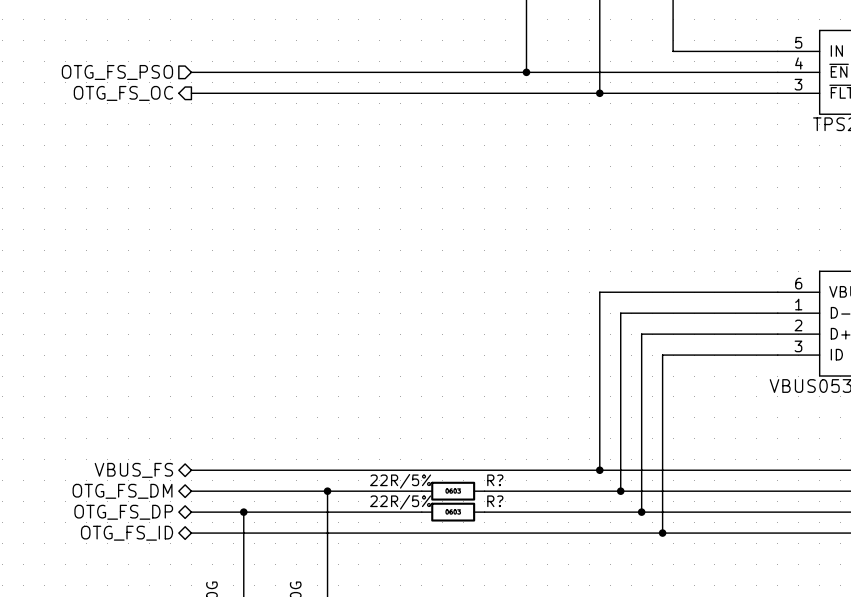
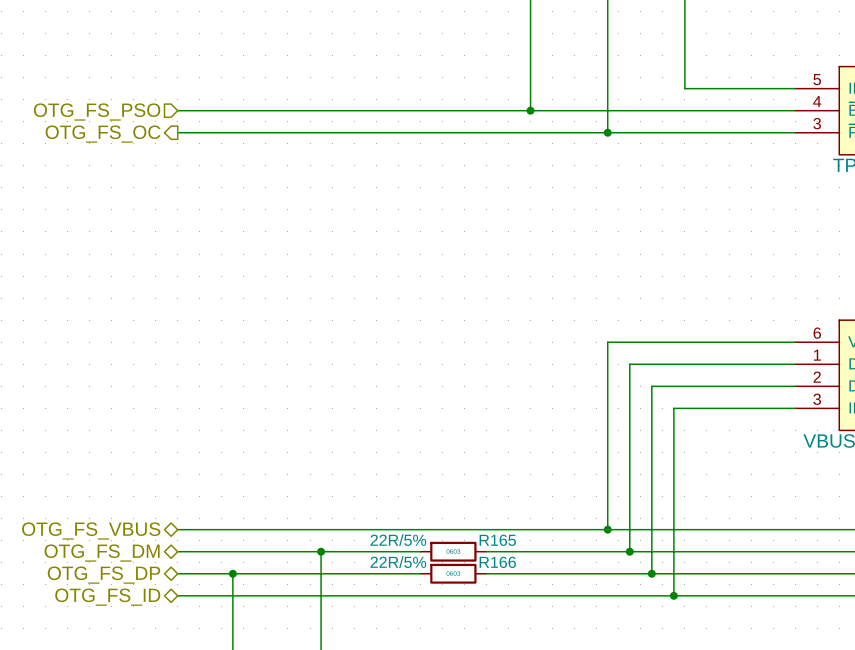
hierarchical label: VBUS_FS (133, 470) -> OTG_FS_VBUS (91, 530)
R? name: R? (495, 480) -> R165 (497, 540)
R? name: R? (495, 501) -> R166 (497, 562)

